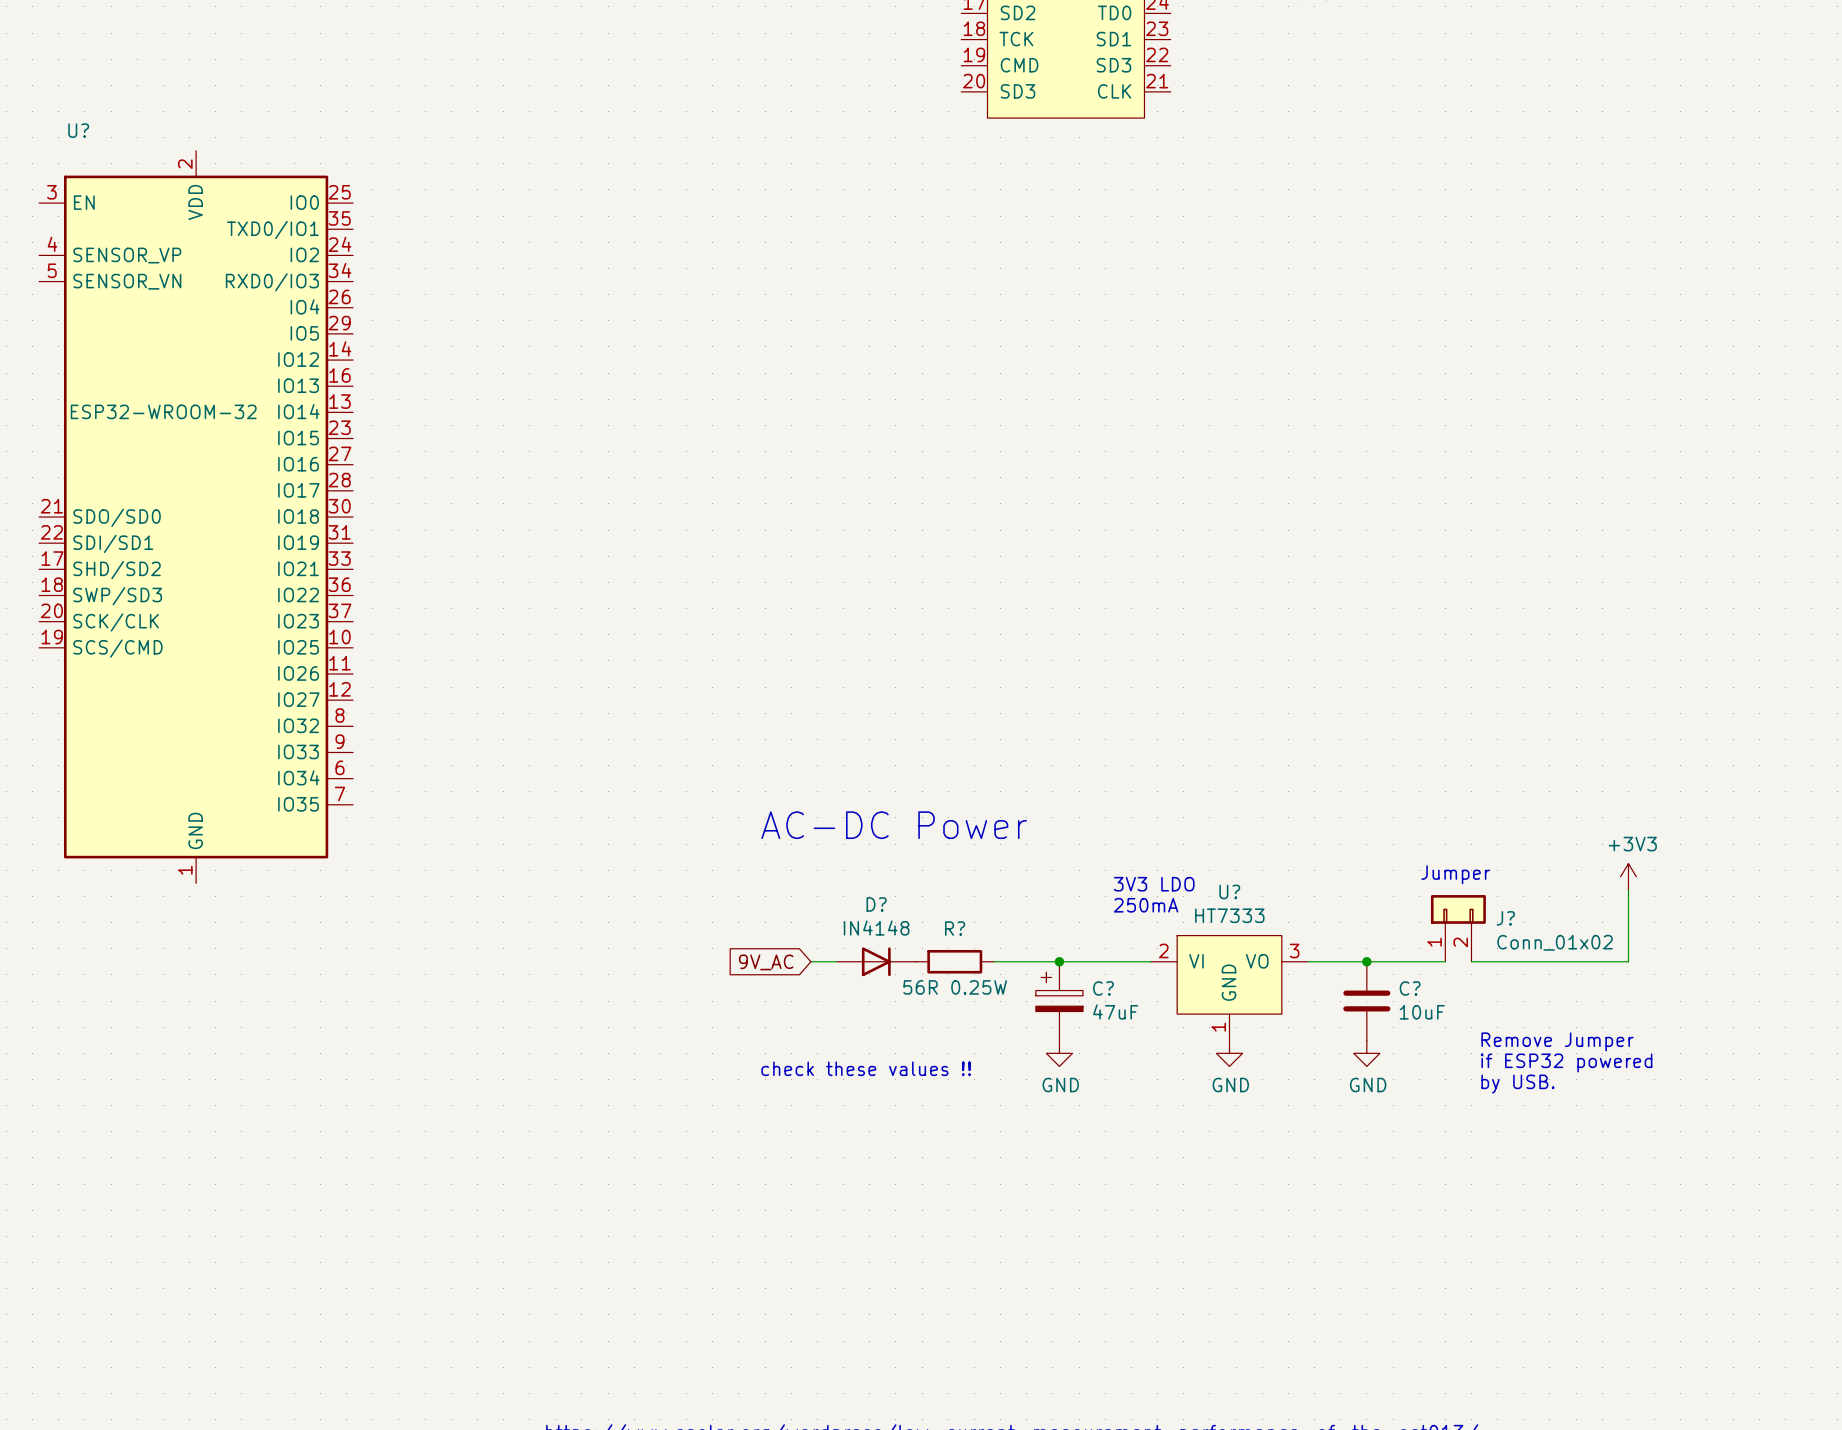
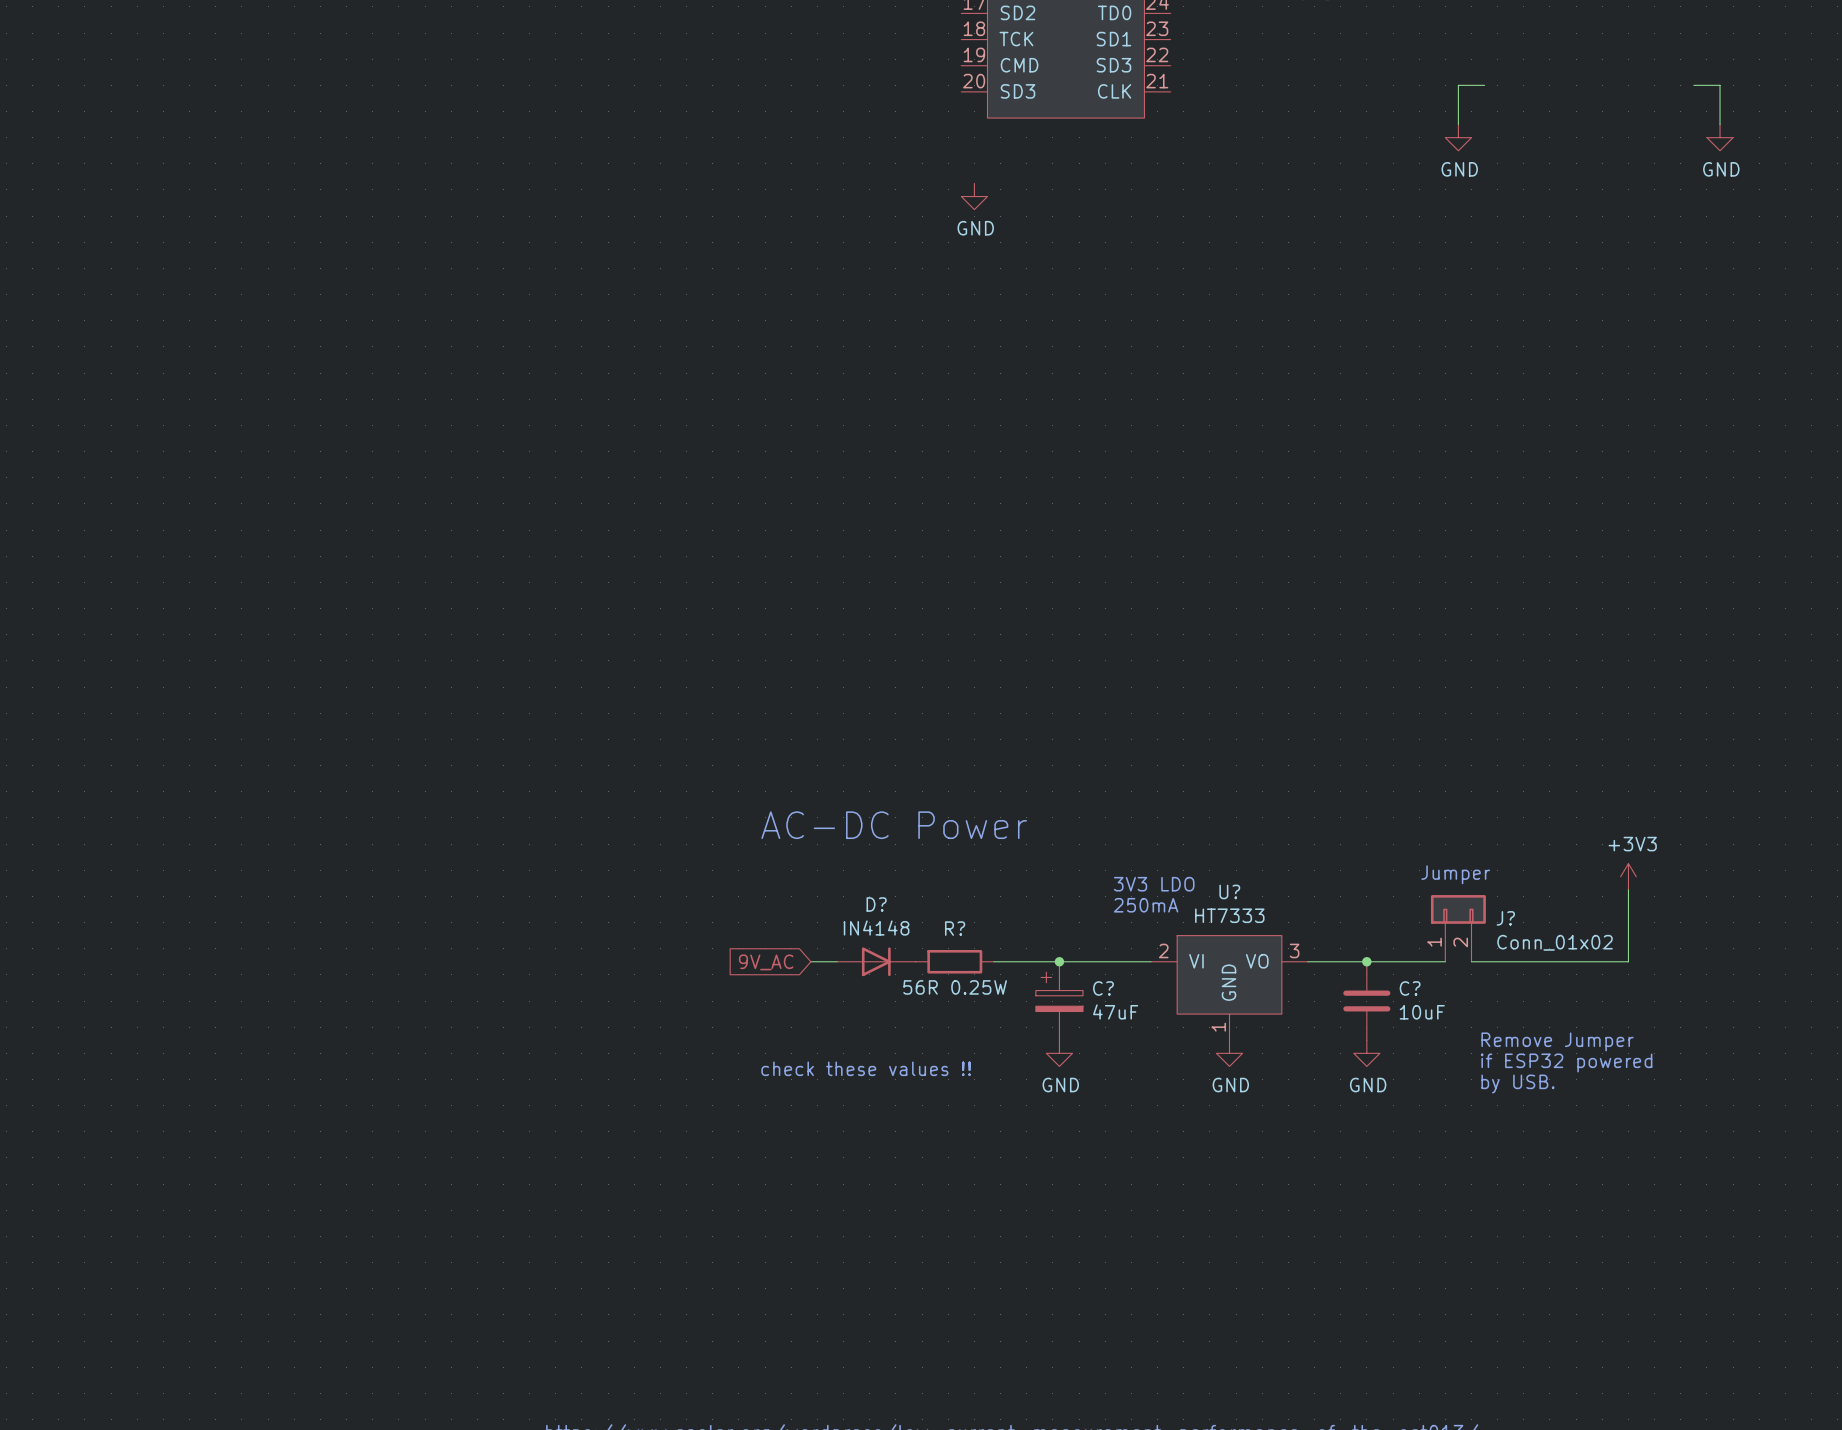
wire: none -> (1484, 85) (1458, 85) (1458, 124)
wire: none -> (1693, 85) (1720, 85) (1720, 124)
power symbol: none -> GND (1458, 137)
power symbol: none -> GND (1720, 137)
power symbol: none -> GND (974, 196)
U?: ESP32-WROOM-32 (196, 517) -> none

